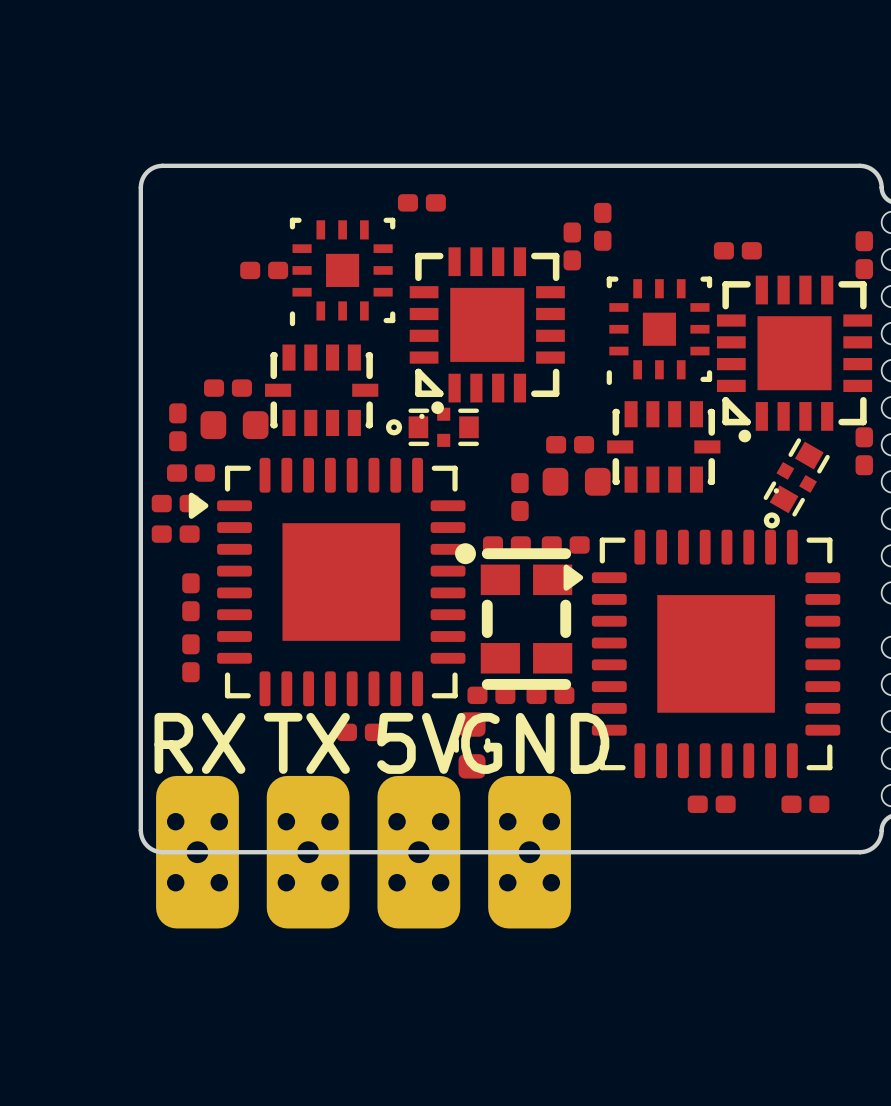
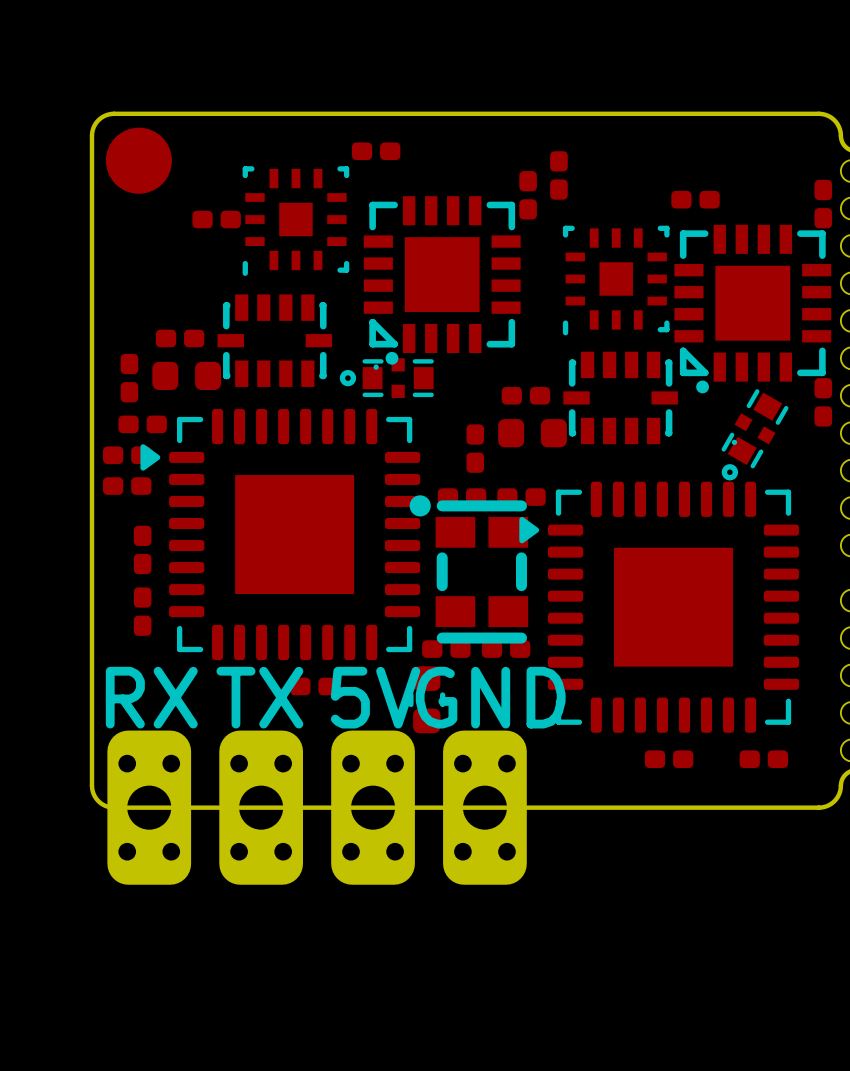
part: none -> (138, 160)
part footprint: [156, 775, 239, 929] -> [107, 730, 192, 885]
part footprint: [266, 775, 350, 929] -> [219, 730, 304, 885]
part footprint: [377, 775, 461, 929] -> [331, 730, 415, 885]
part footprint: [488, 775, 571, 929] -> [443, 730, 527, 885]

